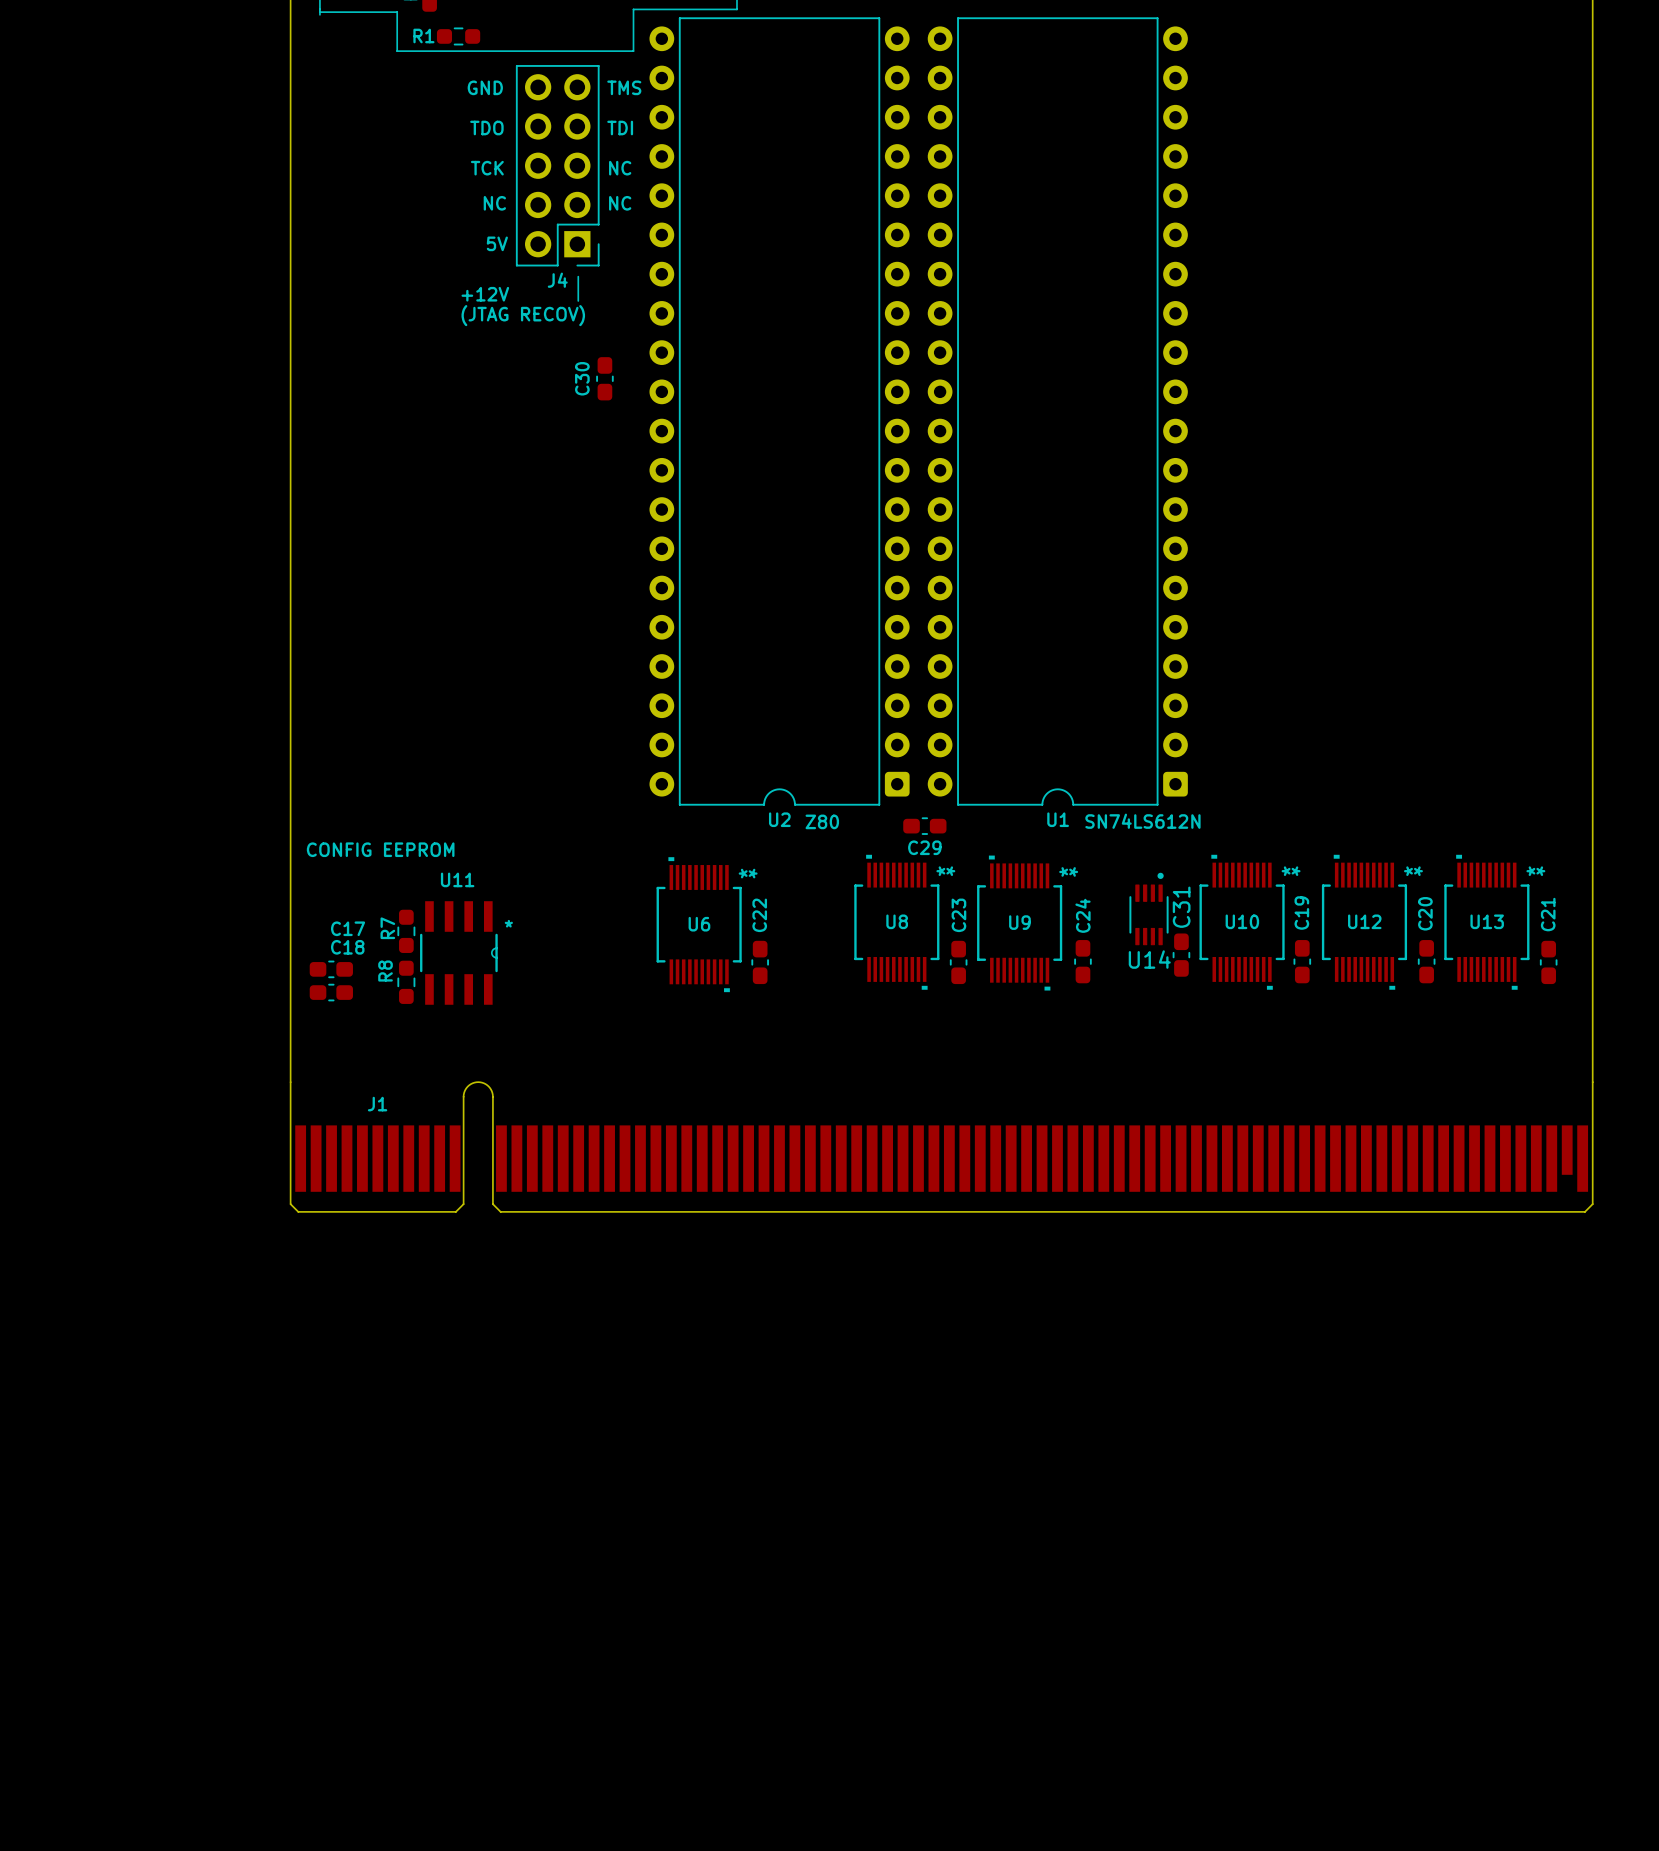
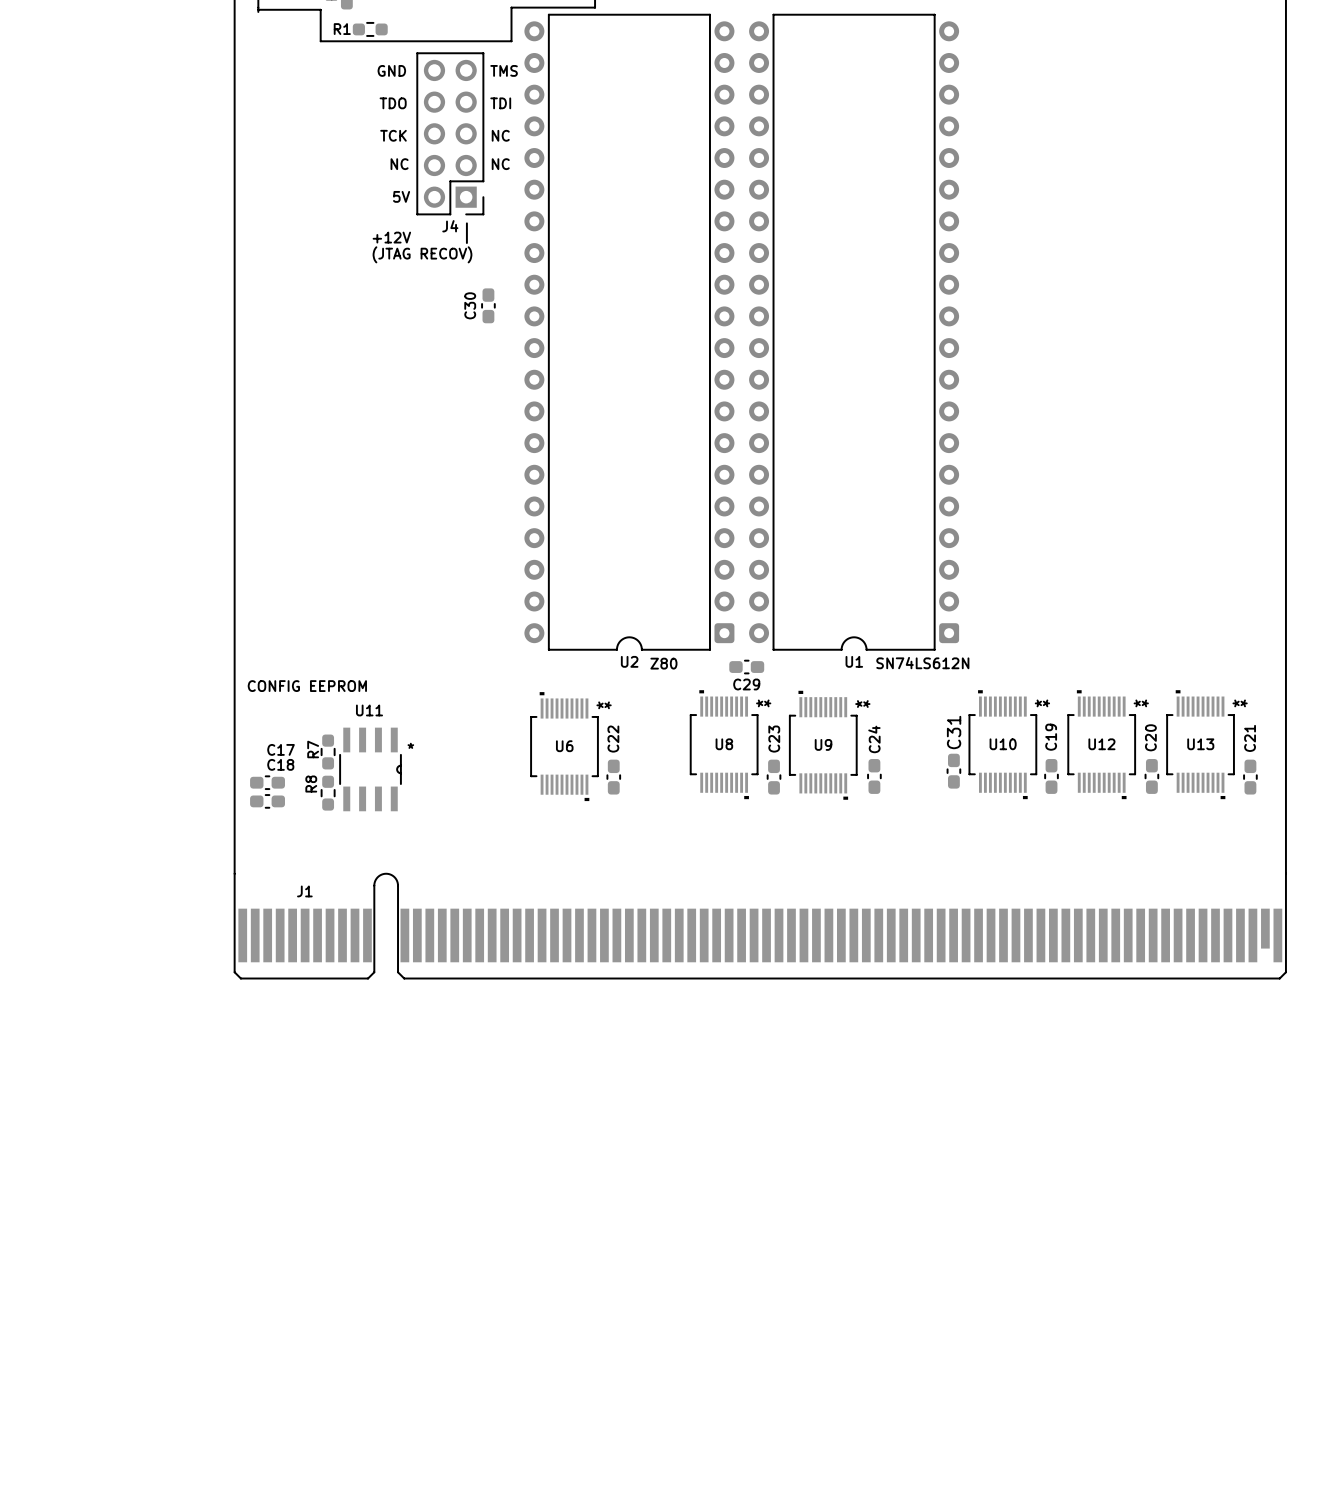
U14: (1149, 908) -> none

